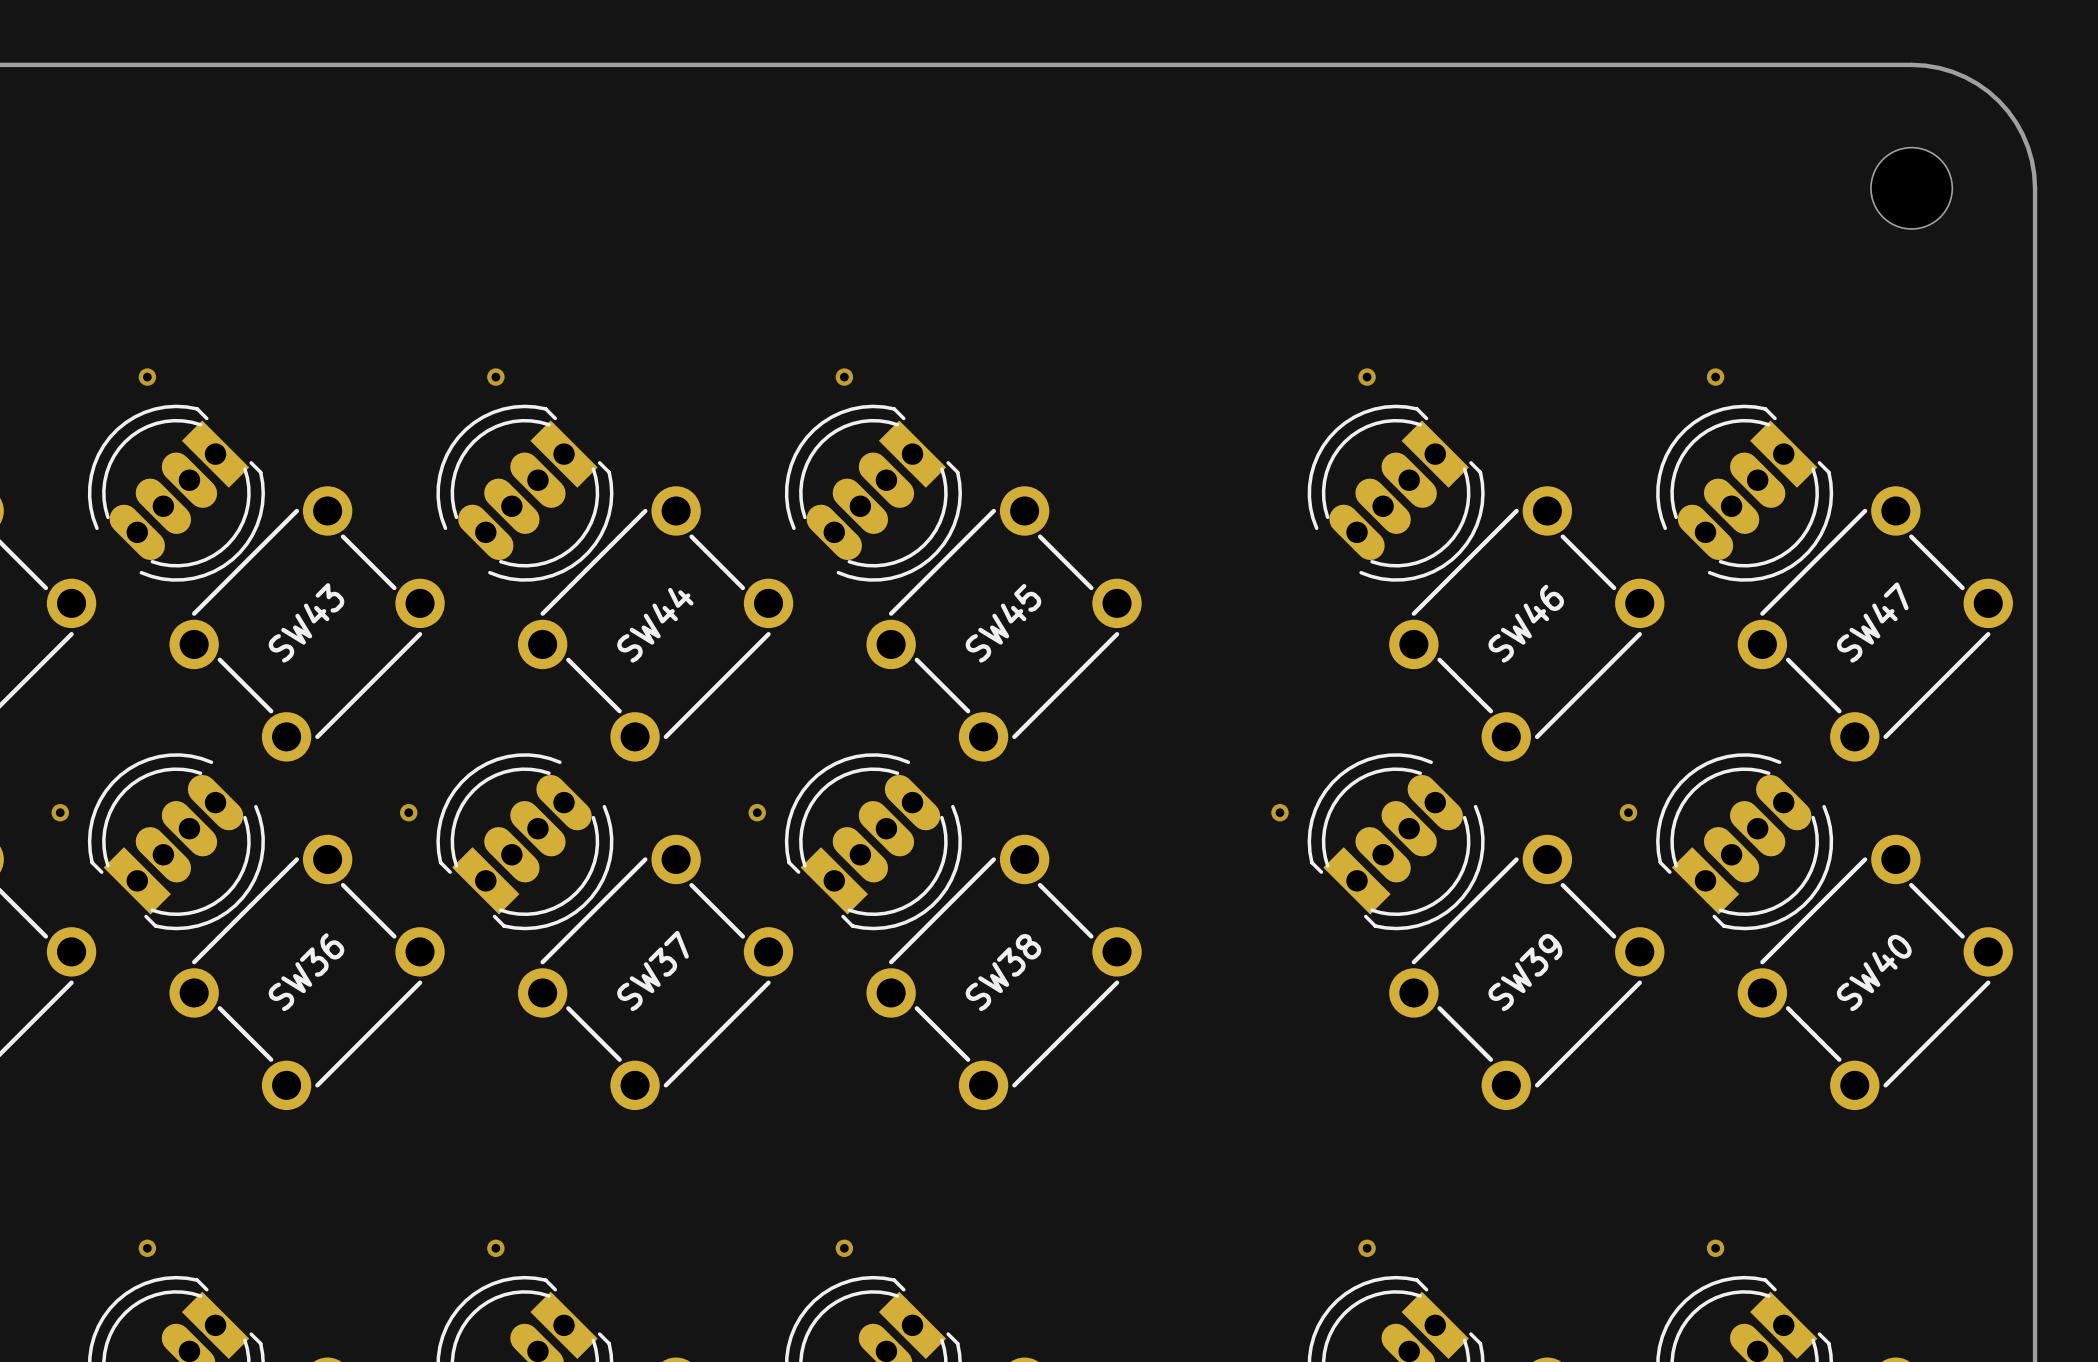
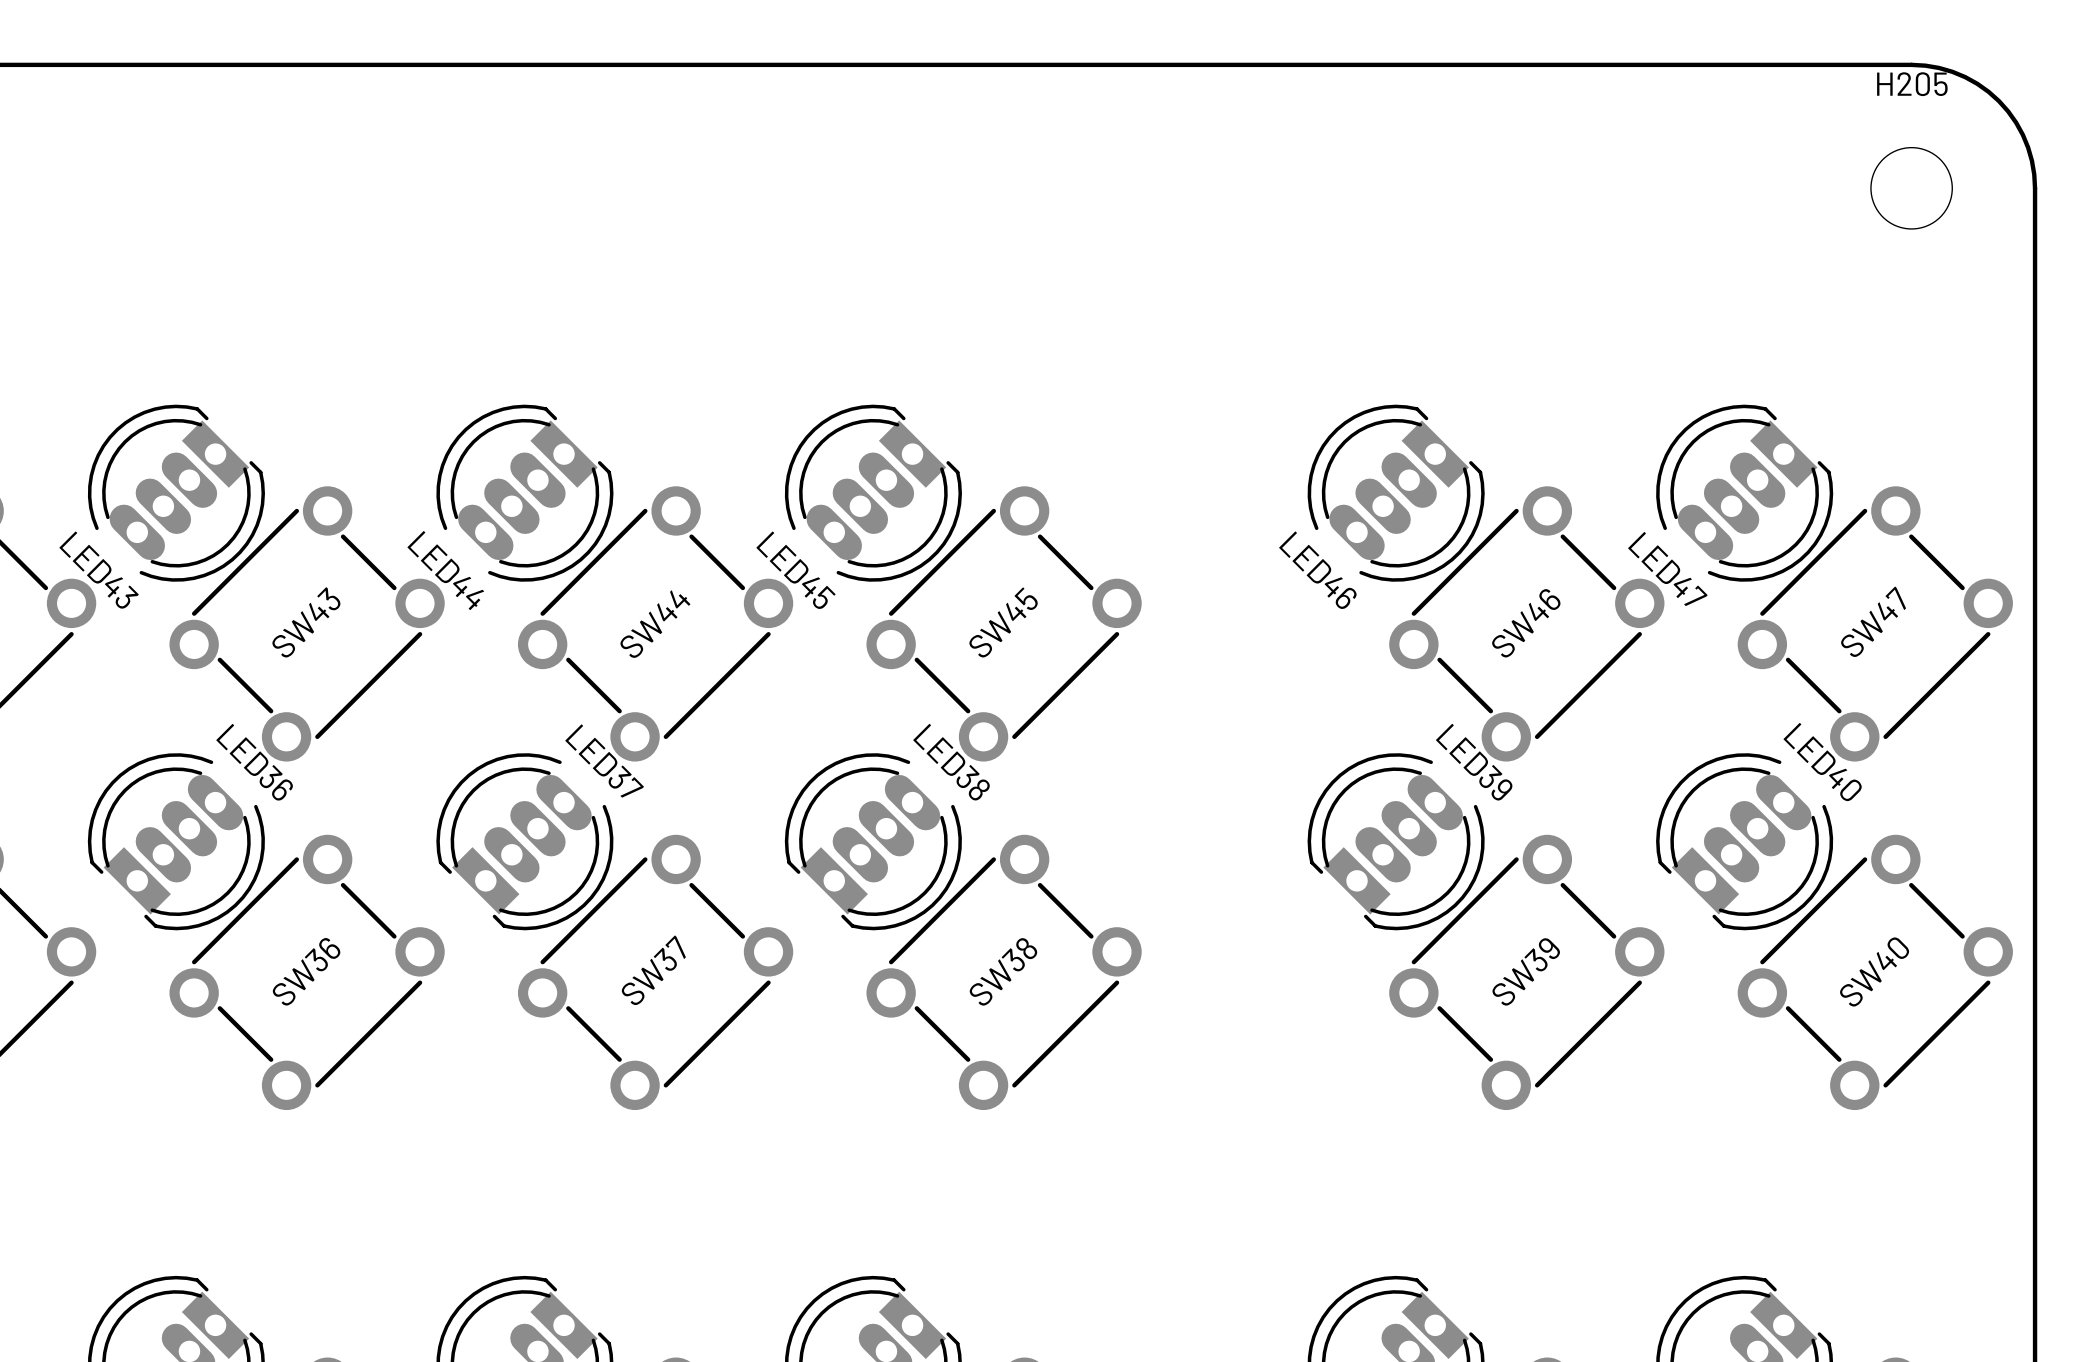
H205 name: none -> H205 (1912, 84)
via: (147, 377) -> none
via: (495, 377) -> none
via: (844, 377) -> none
via: (1367, 377) -> none
via: (1715, 377) -> none
LED47 name: none -> LED47 (1667, 568)
LED43 name: none -> LED43 (99, 570)
LED44 name: none -> LED44 (445, 570)
LED45 name: none -> LED45 (795, 570)
LED46 name: none -> LED46 (1317, 570)
LED37 name: none -> LED37 (604, 760)
LED39 name: none -> LED39 (1474, 762)
LED40 name: none -> LED40 (1822, 761)
LED36 name: none -> LED36 (254, 762)
LED38 name: none -> LED38 (951, 762)
via: (60, 812) -> none
via: (408, 812) -> none
via: (757, 812) -> none
via: (1279, 812) -> none
via: (1628, 812) -> none
via: (147, 1248) -> none
via: (495, 1248) -> none
via: (844, 1248) -> none
via: (1367, 1248) -> none
via: (1715, 1248) -> none

